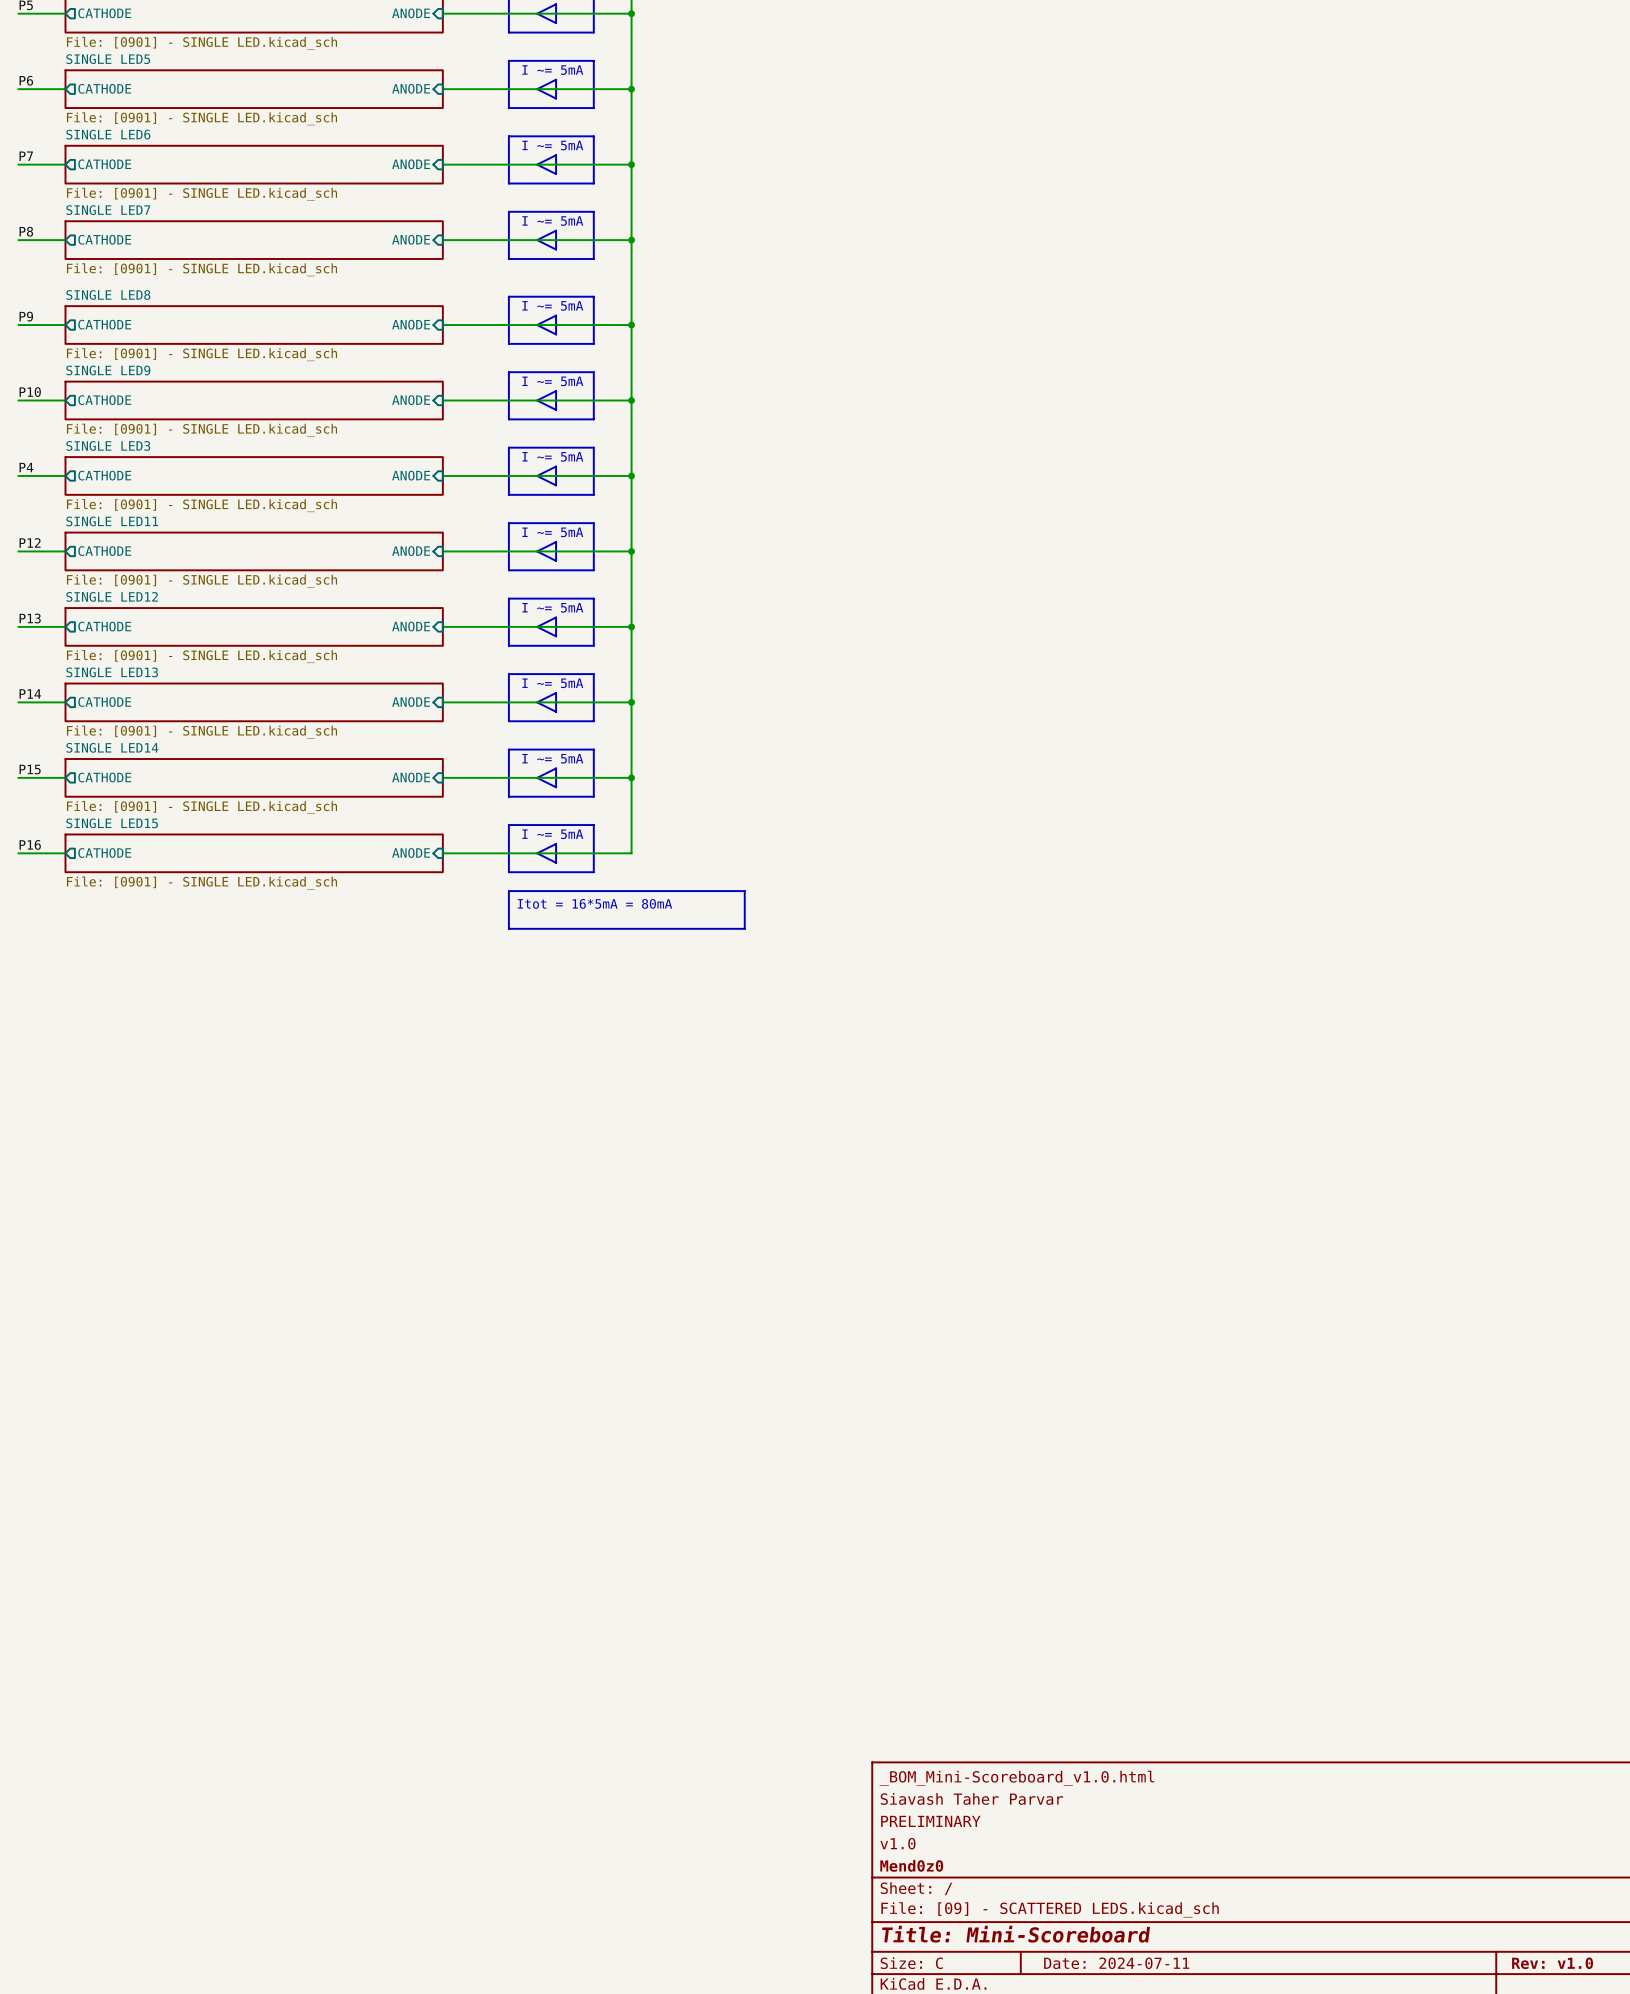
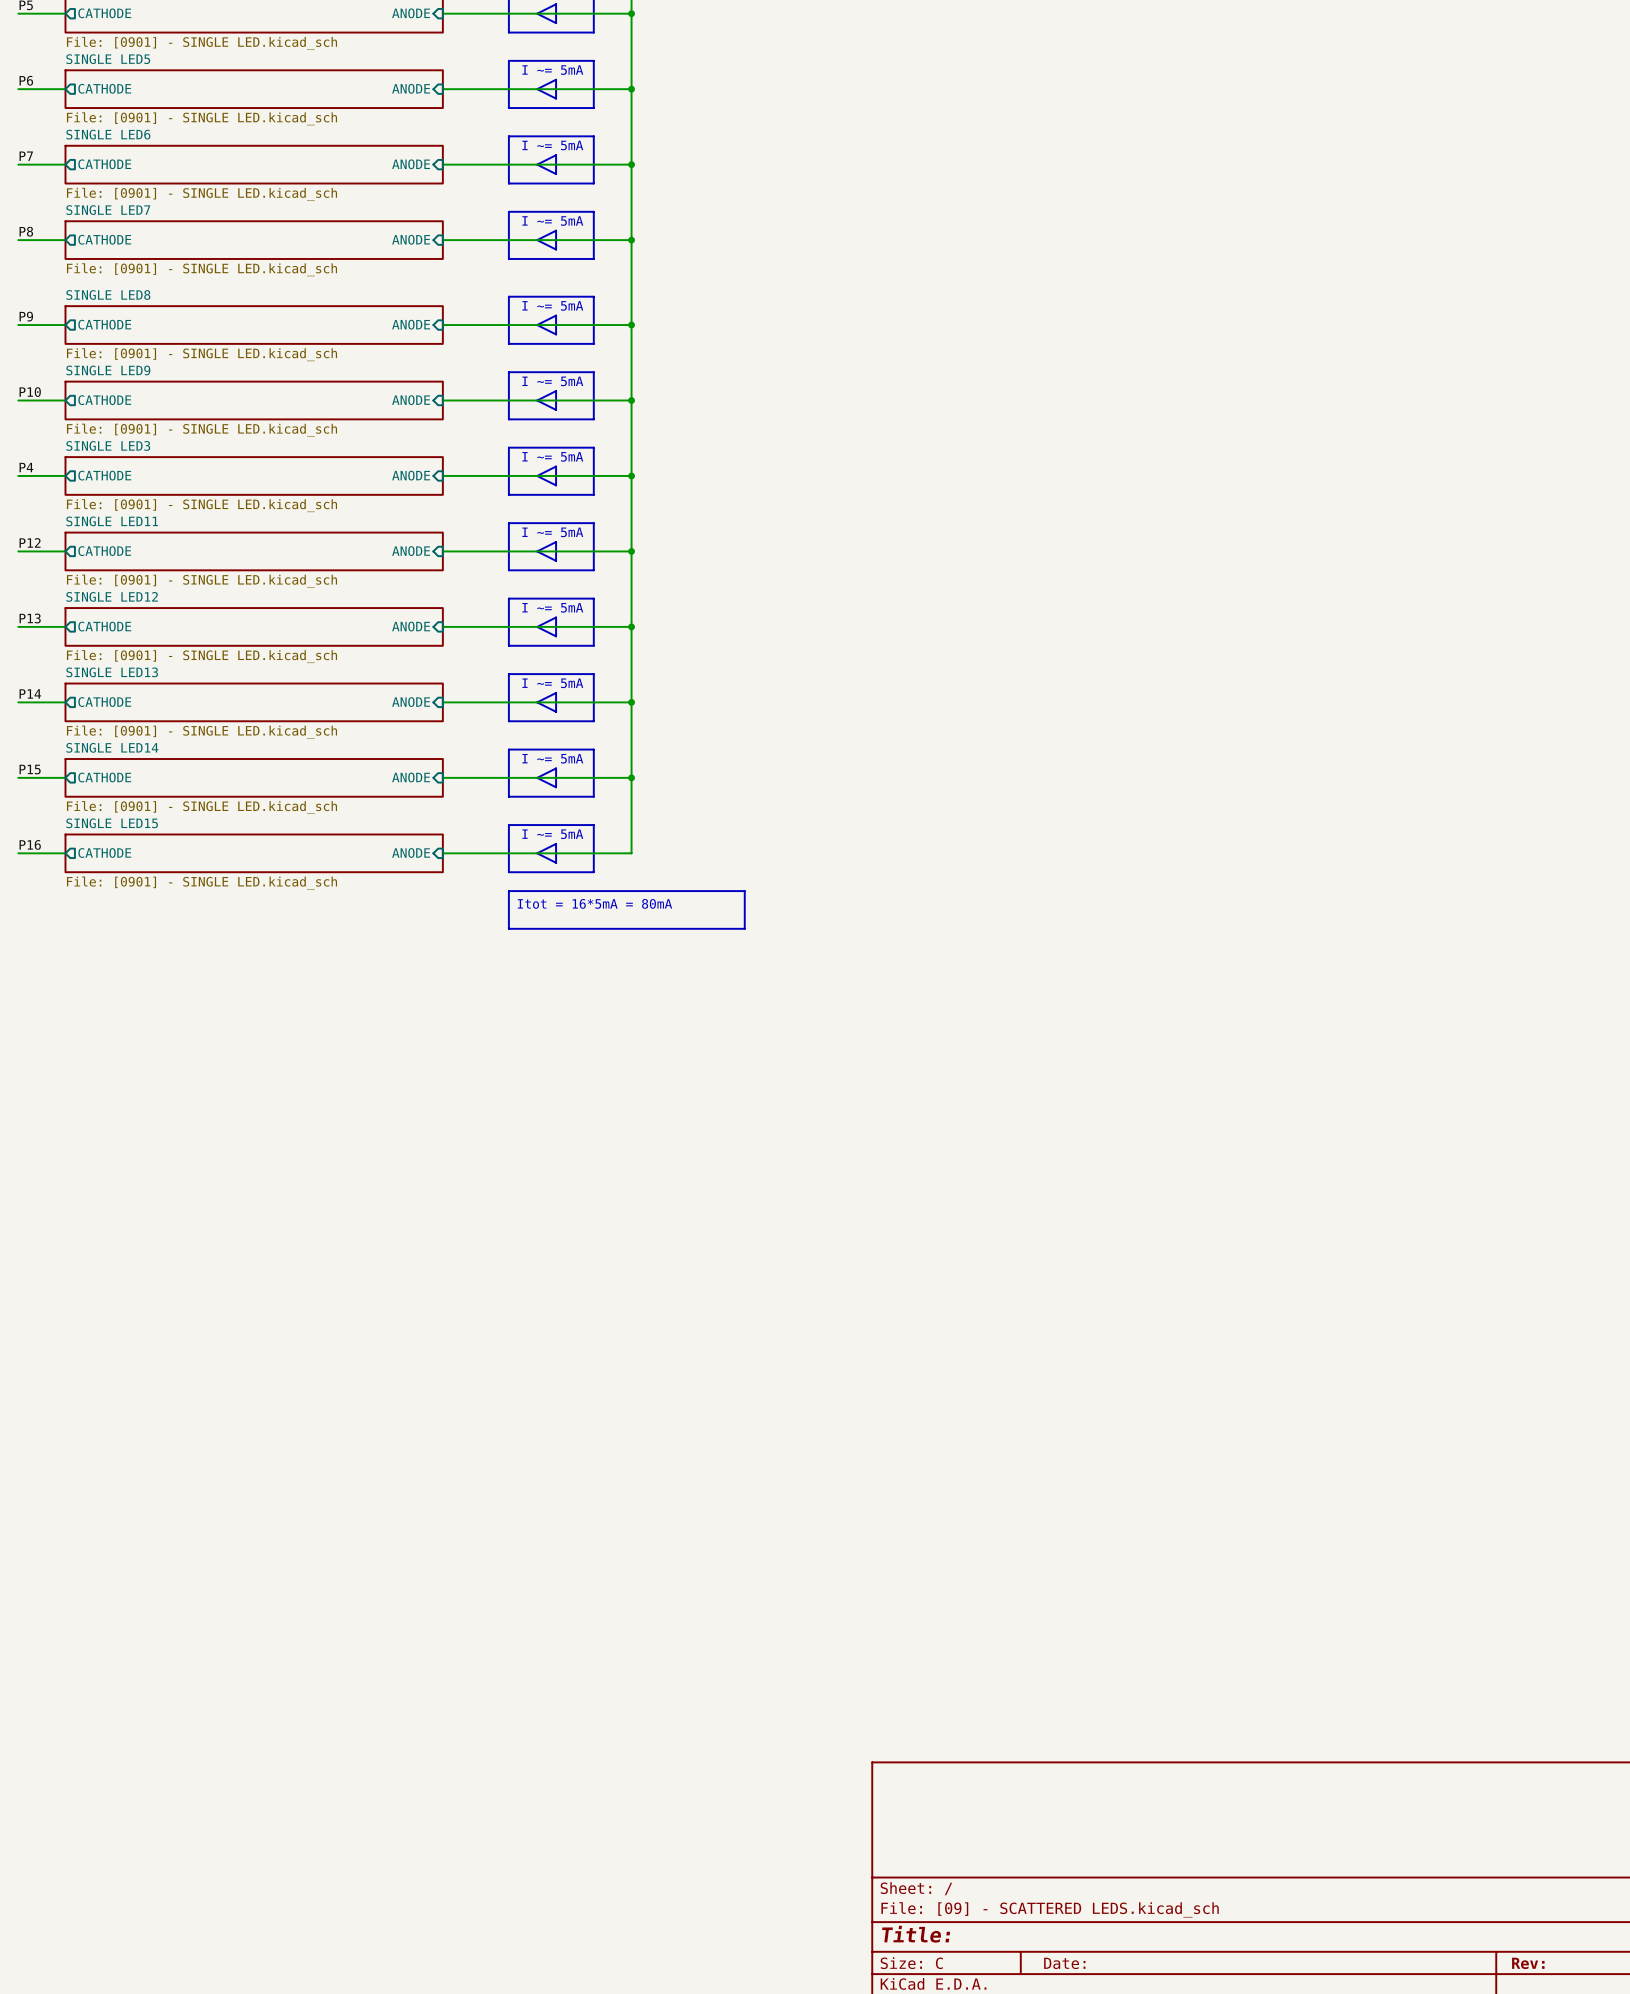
title block: _BOM_Mini-Scoreboard_v1.0.html (1016, 1778) -> none
title block: Siavash Taher Parvar (971, 1798) -> none
title block: PRELIMINARY (930, 1821) -> none
title block: v1.0 (897, 1843) -> none
title block: Mend0z0 (911, 1865) -> none
title block: Title: Mini-Scoreboard (1016, 1934) -> Title: (916, 1934)
title block: Date: 2024-07-11 (1116, 1963) -> Date: (1064, 1963)
title block: Rev: v1.0 (1552, 1963) -> Rev: (1528, 1963)

